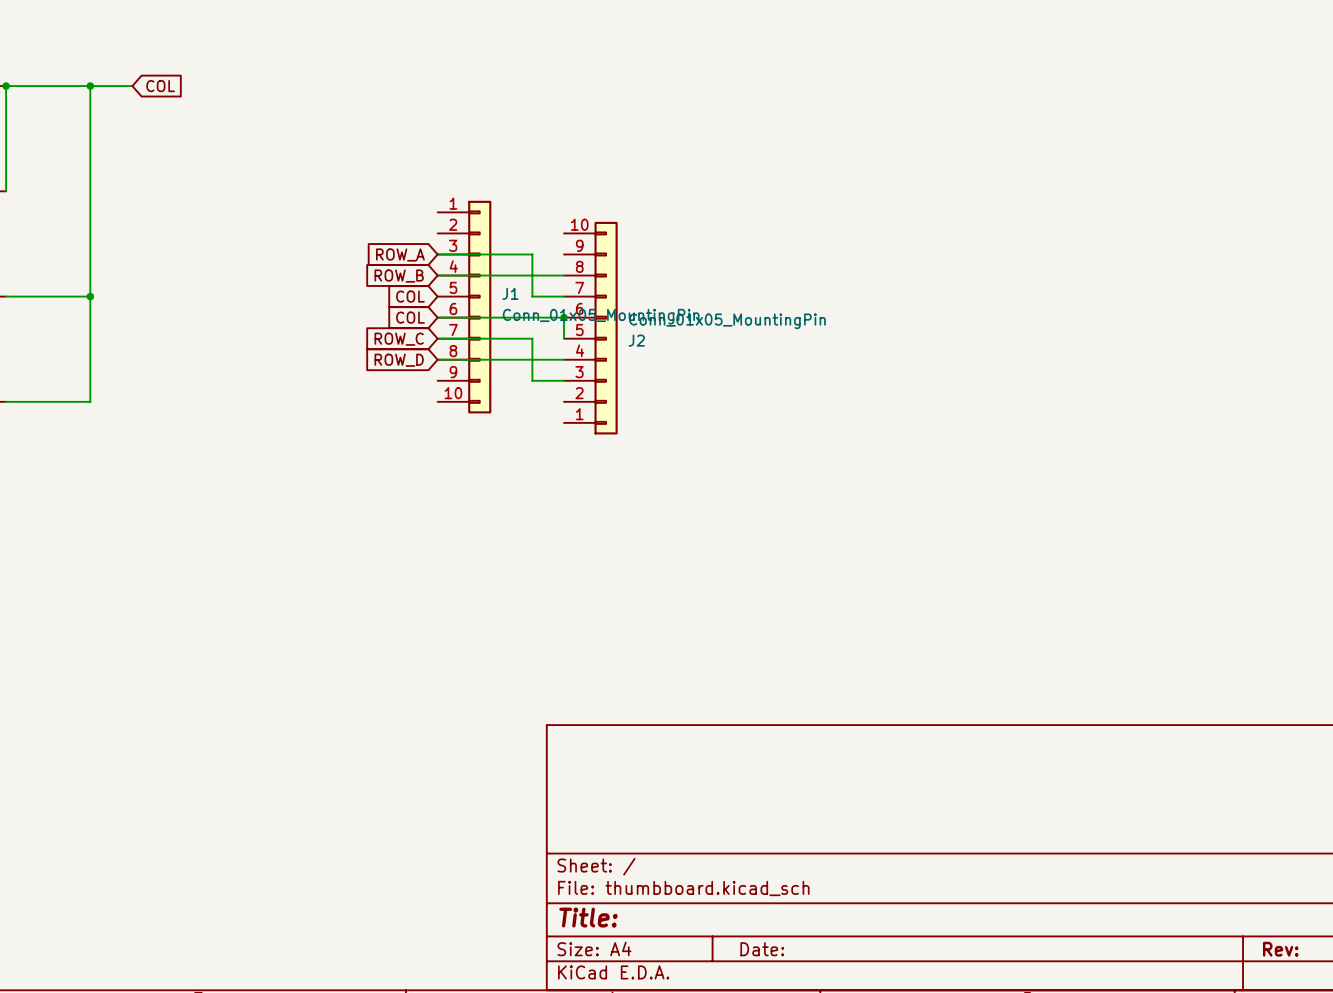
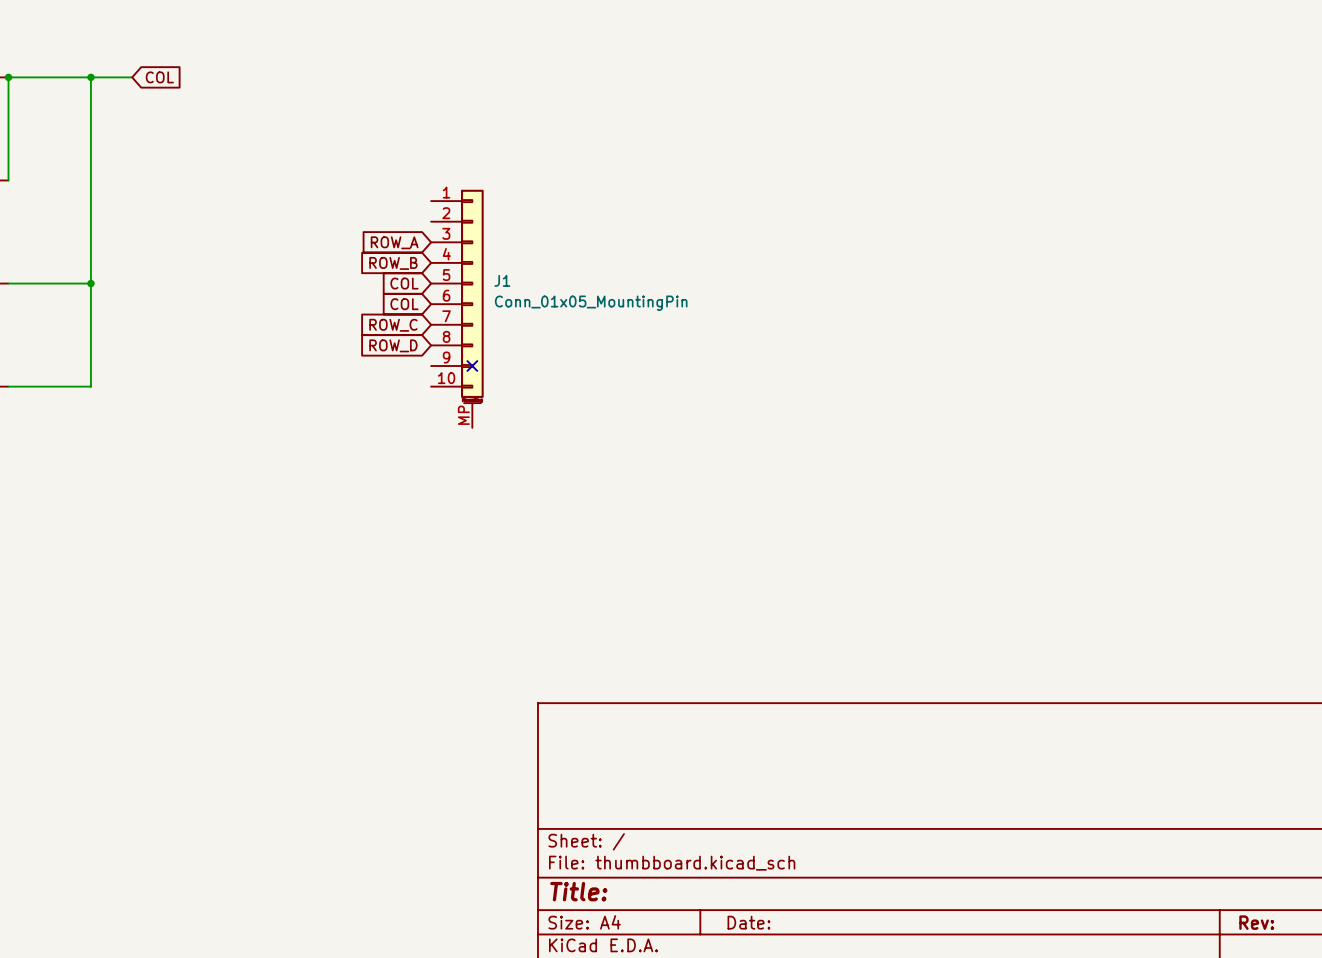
J1 symbol: [437, 200, 492, 414] -> [431, 189, 484, 428]
wire: (437, 254) (532, 254) (532, 296) (563, 296) -> none
wire: (437, 275) (563, 275) -> none
wire: (437, 317) (563, 317) (563, 338) -> none
junction: (563, 317) -> none
J2: Conn_01x05_MountingPin (590, 328) -> none
wire: (437, 338) (532, 338) (532, 380) (563, 380) -> none
wire: (437, 359) (563, 359) -> none
no-connect mark: none -> (472, 366)

